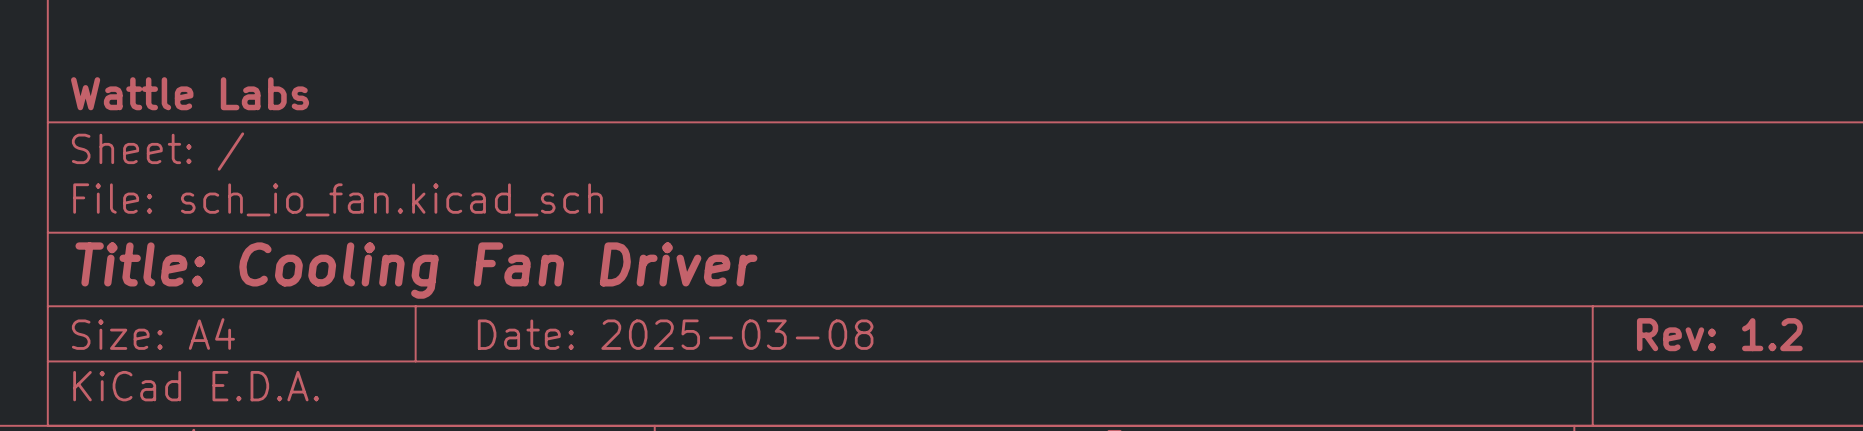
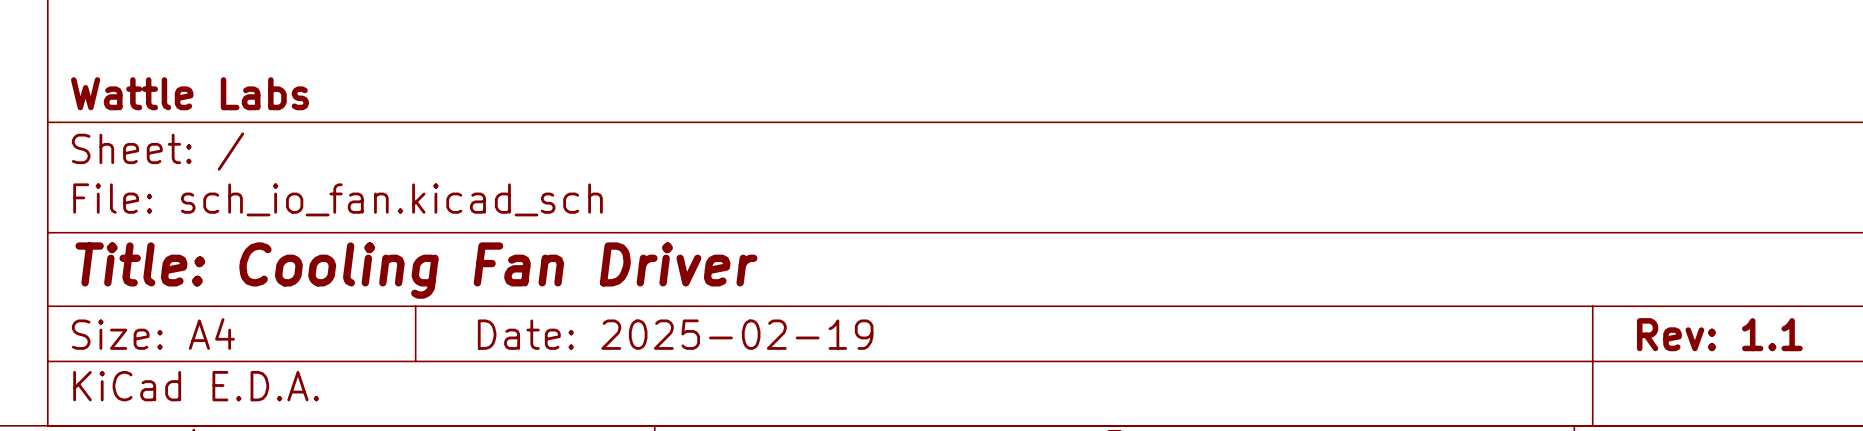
title block: Date: 2025-03-08 (675, 334) -> Date: 2025-02-19 (675, 334)
title block: Rev: 1.2 (1719, 334) -> Rev: 1.1 (1719, 334)

